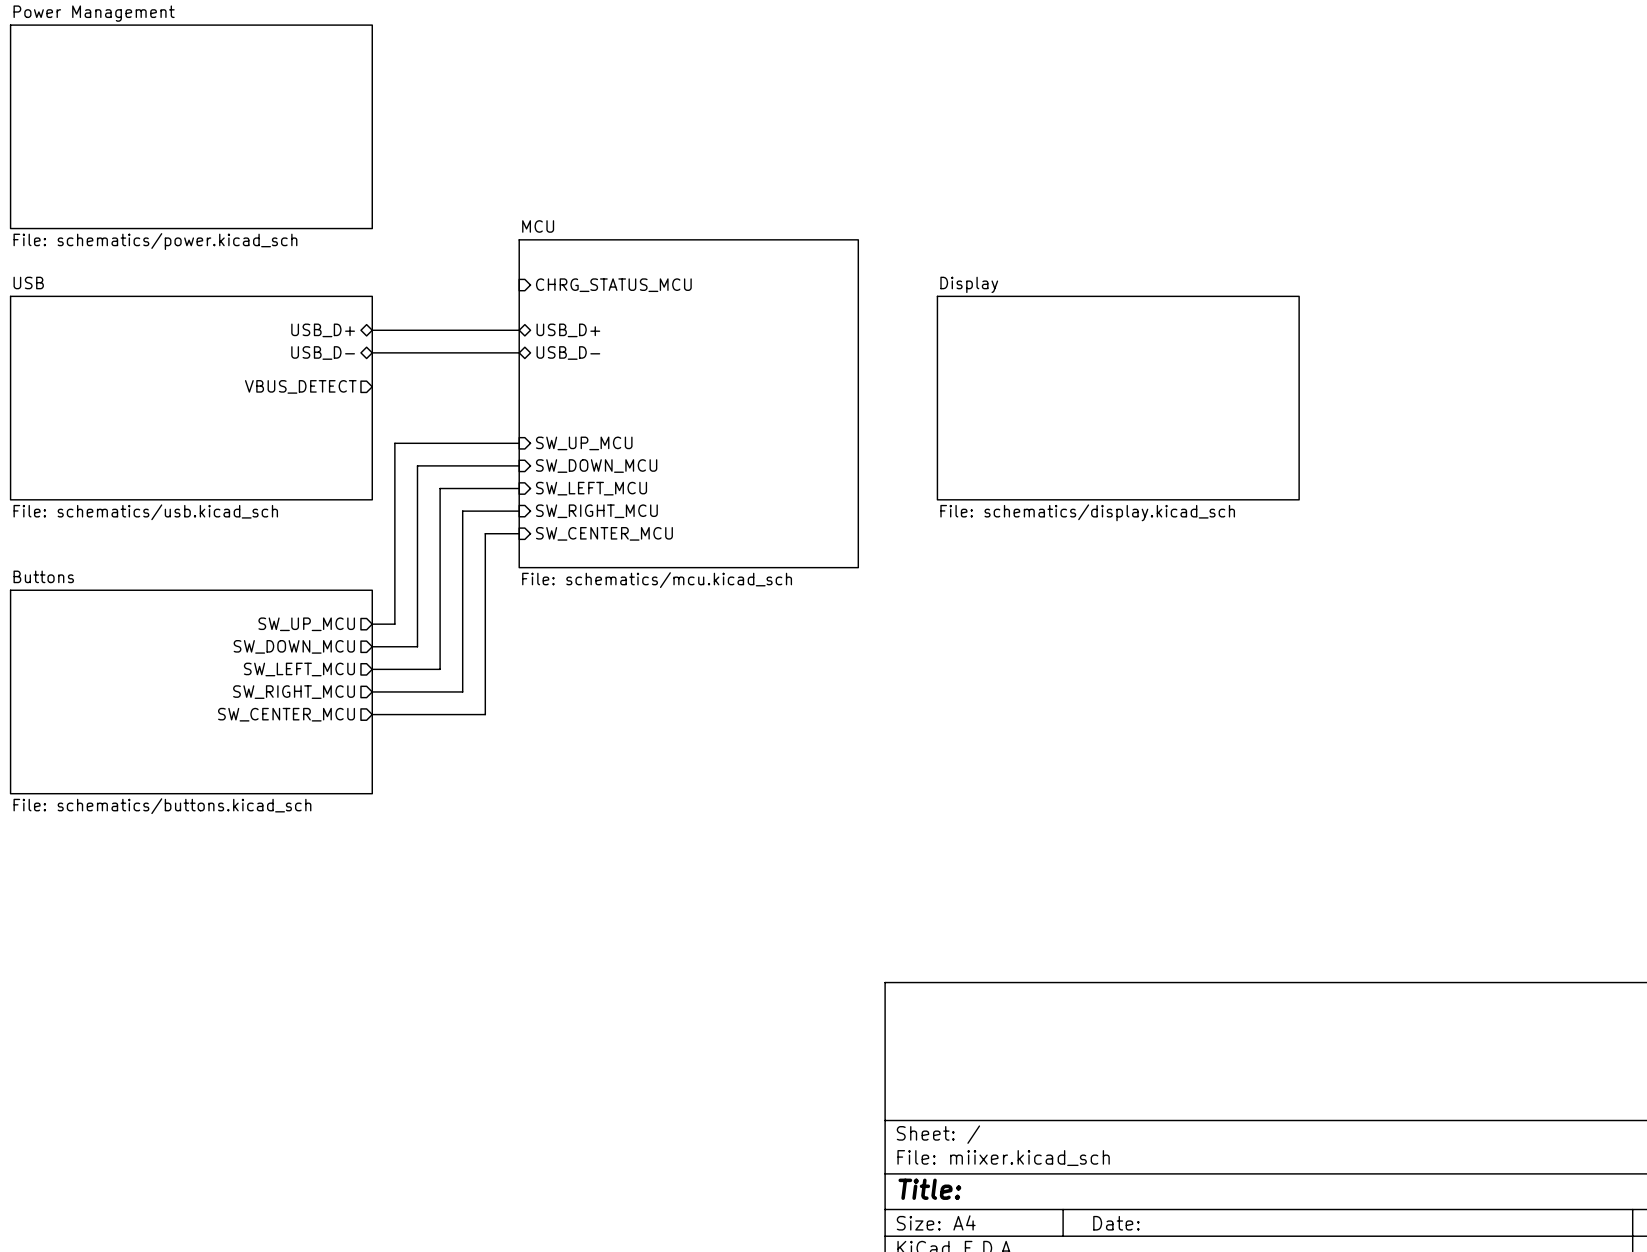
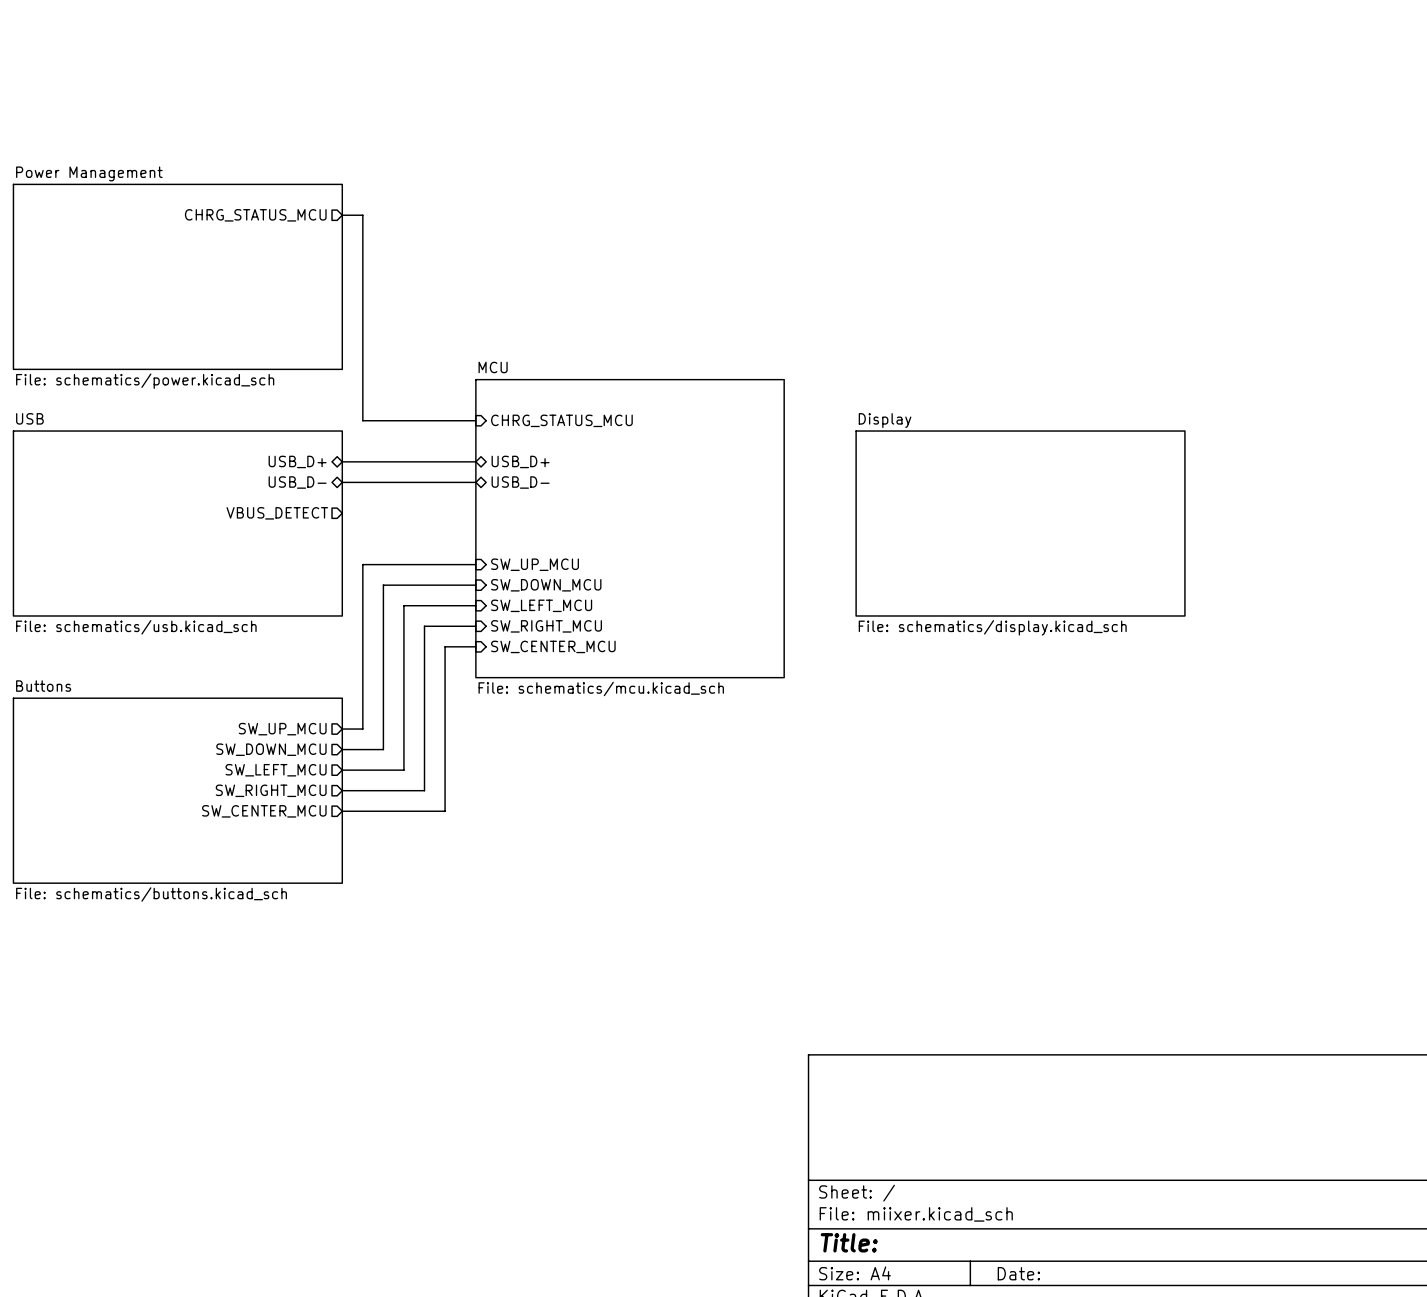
sheet pin: none -> CHRG_STATUS_MCU (255, 215)
wire: none -> (342, 215) (362, 215) (362, 420) (475, 420)

